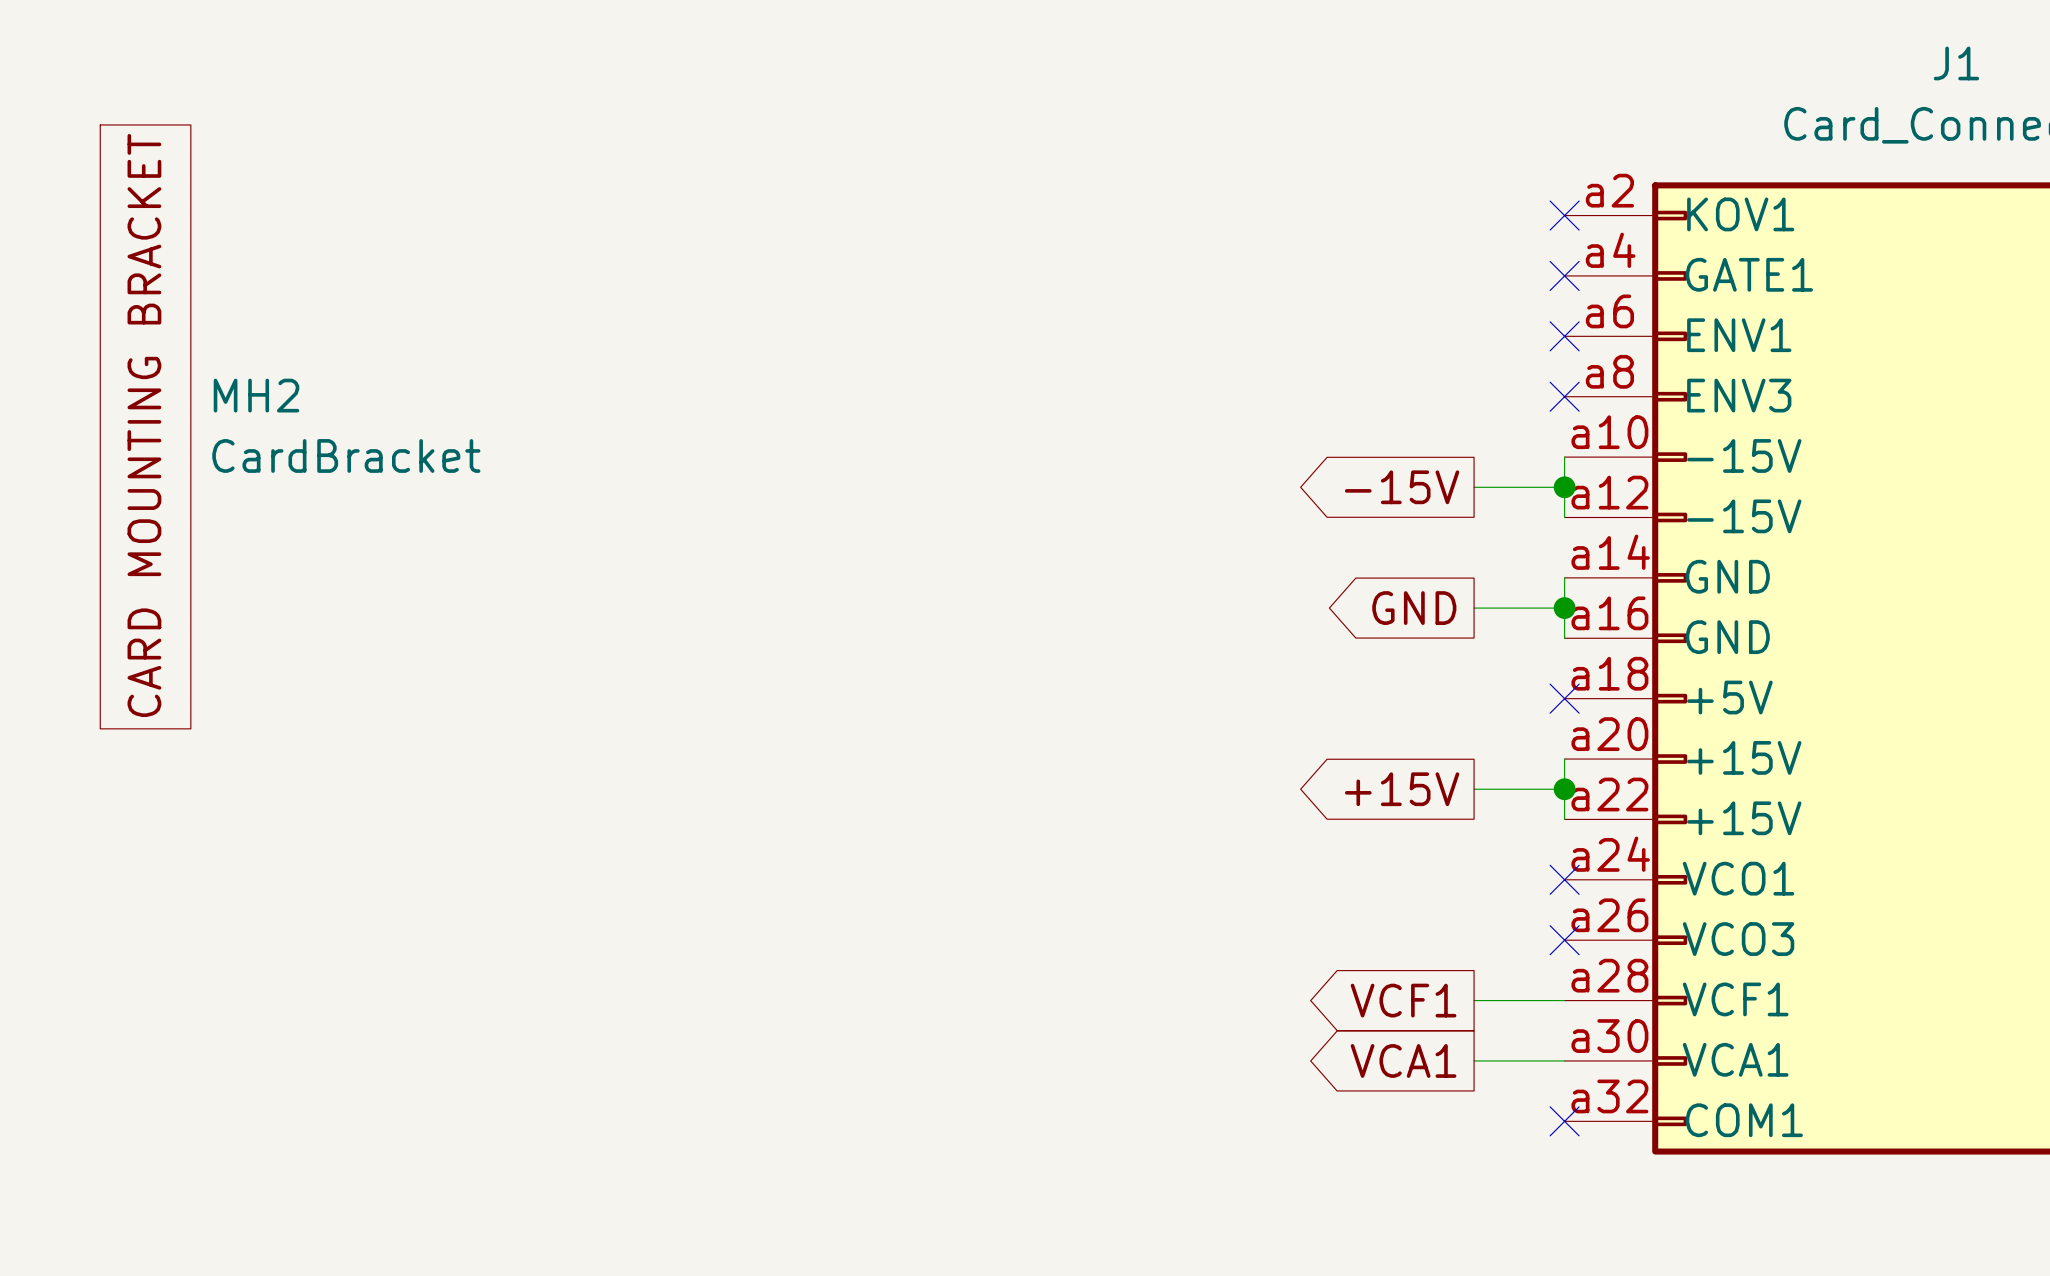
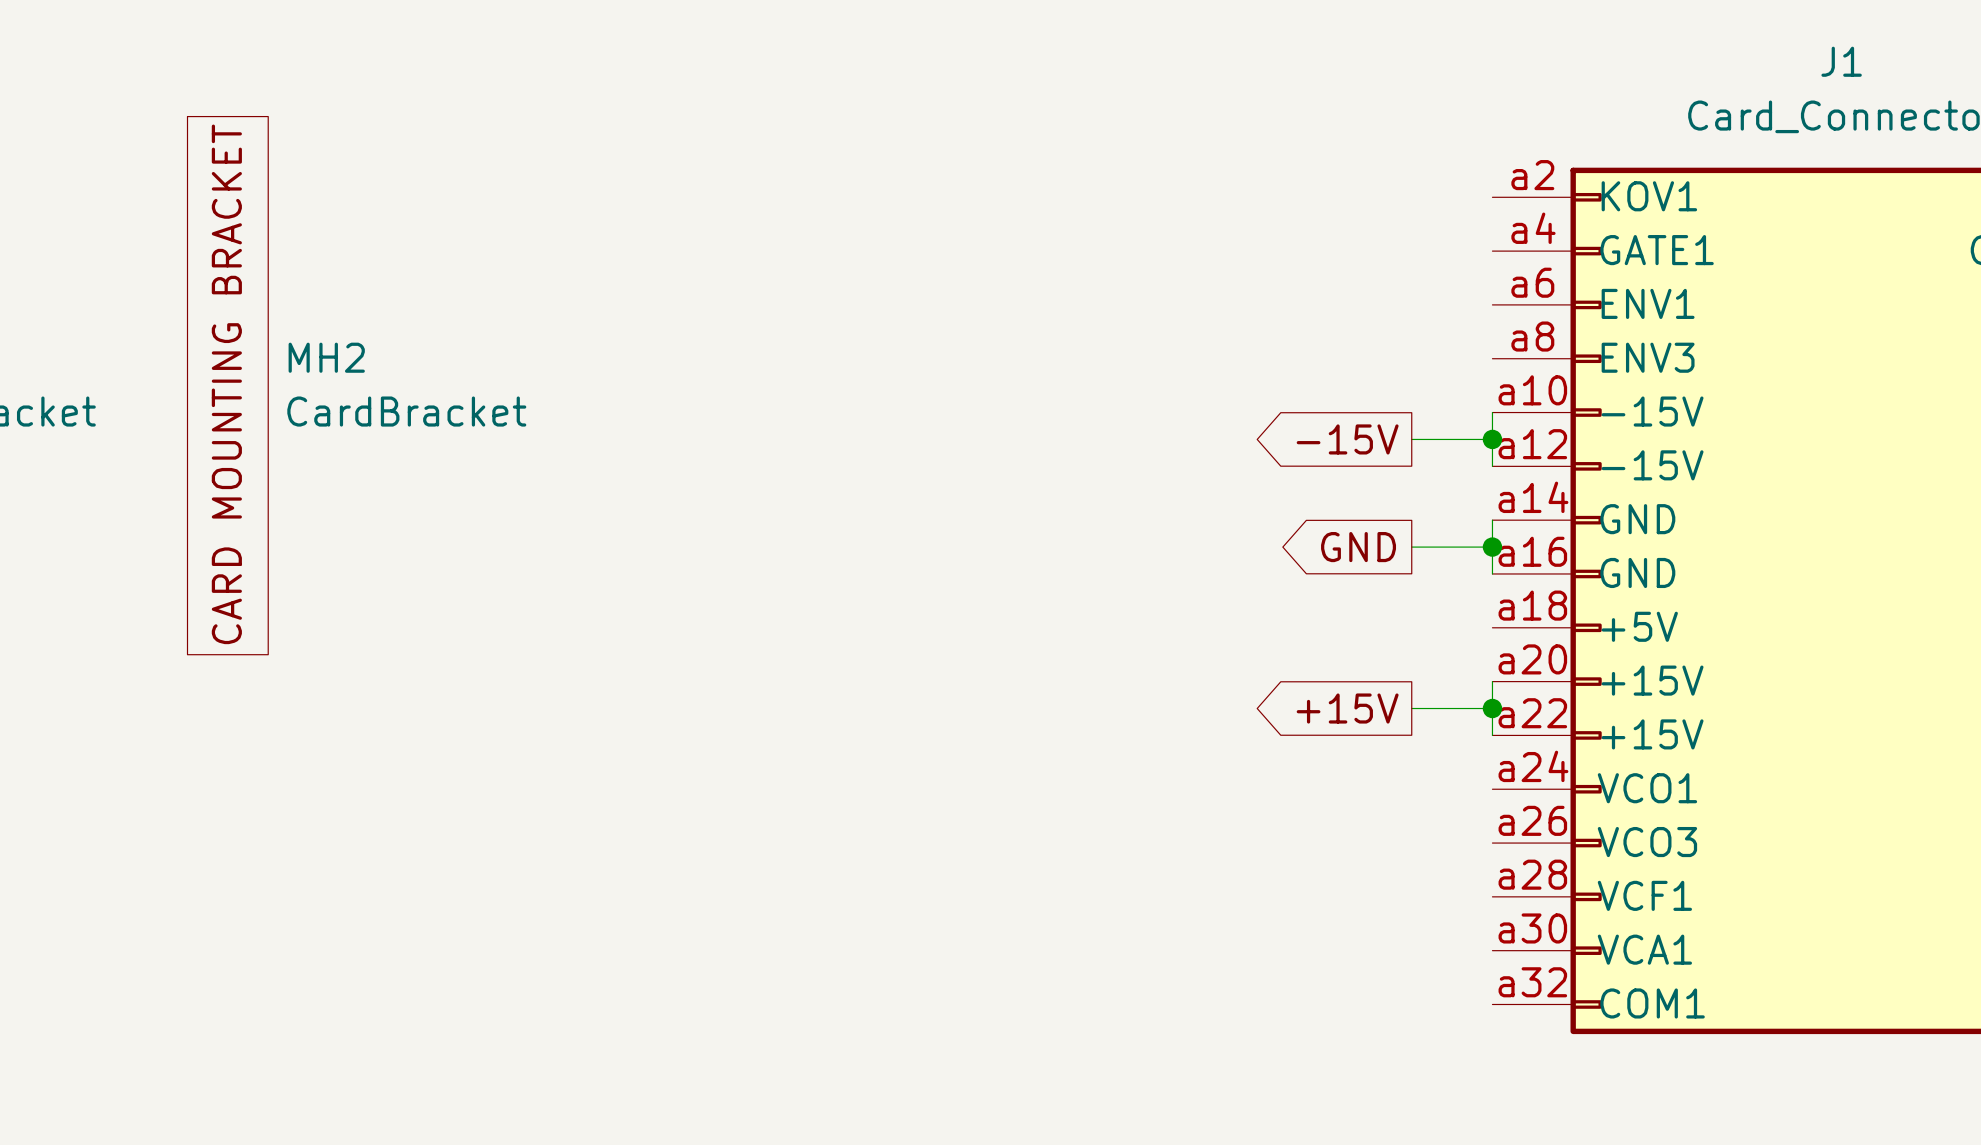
no-connect mark: (1564, 215) -> none
no-connect mark: (1564, 275) -> none
no-connect mark: (1564, 336) -> none
no-connect mark: (1564, 396) -> none
no-connect mark: (1564, 698) -> none
no-connect mark: (1564, 879) -> none
no-connect mark: (1564, 940) -> none
global label: VCF1 (1403, 1000) -> none
wire: (1474, 1000) (1564, 1000) -> none
global label: VCA1 (1403, 1060) -> none
wire: (1474, 1060) (1564, 1060) -> none
no-connect mark: (1564, 1121) -> none

